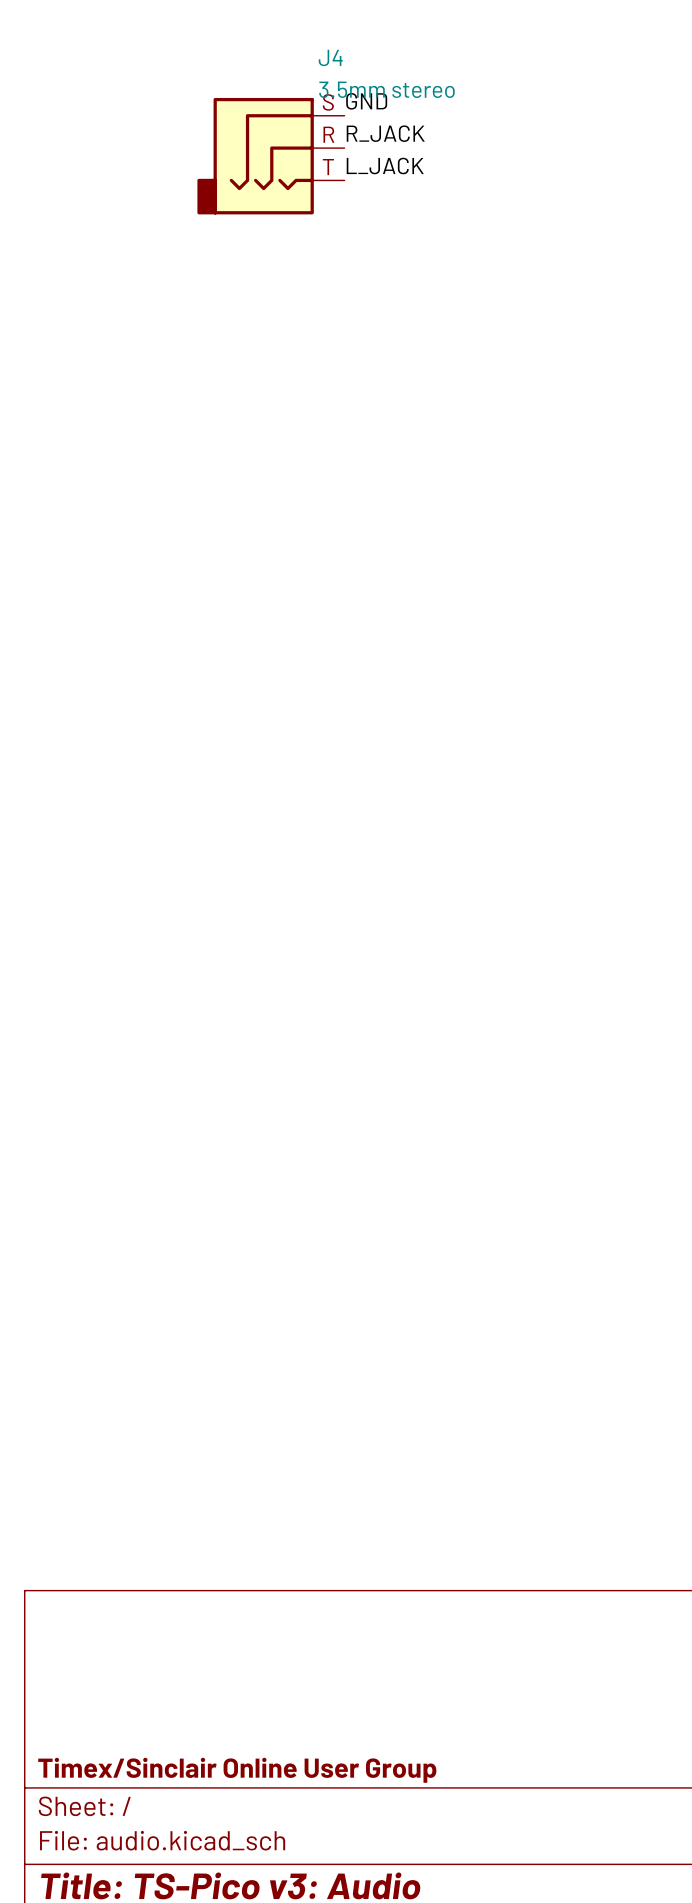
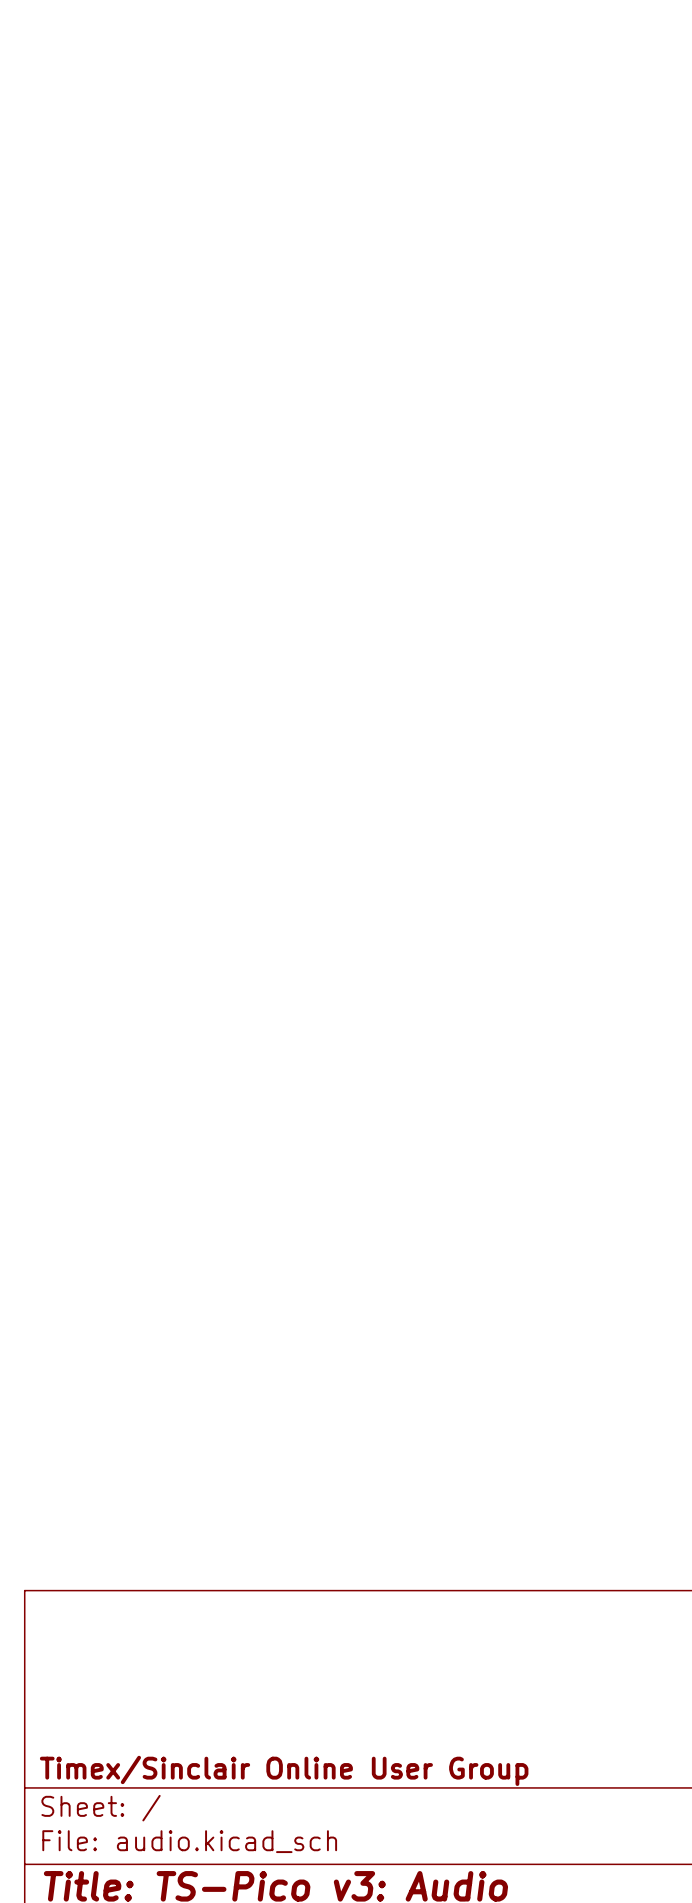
label: GND (366, 101) -> none
label: R_JACK (385, 133) -> none
J4: 3.5mm stereo (270, 156) -> none
label: L_JACK (385, 166) -> none

